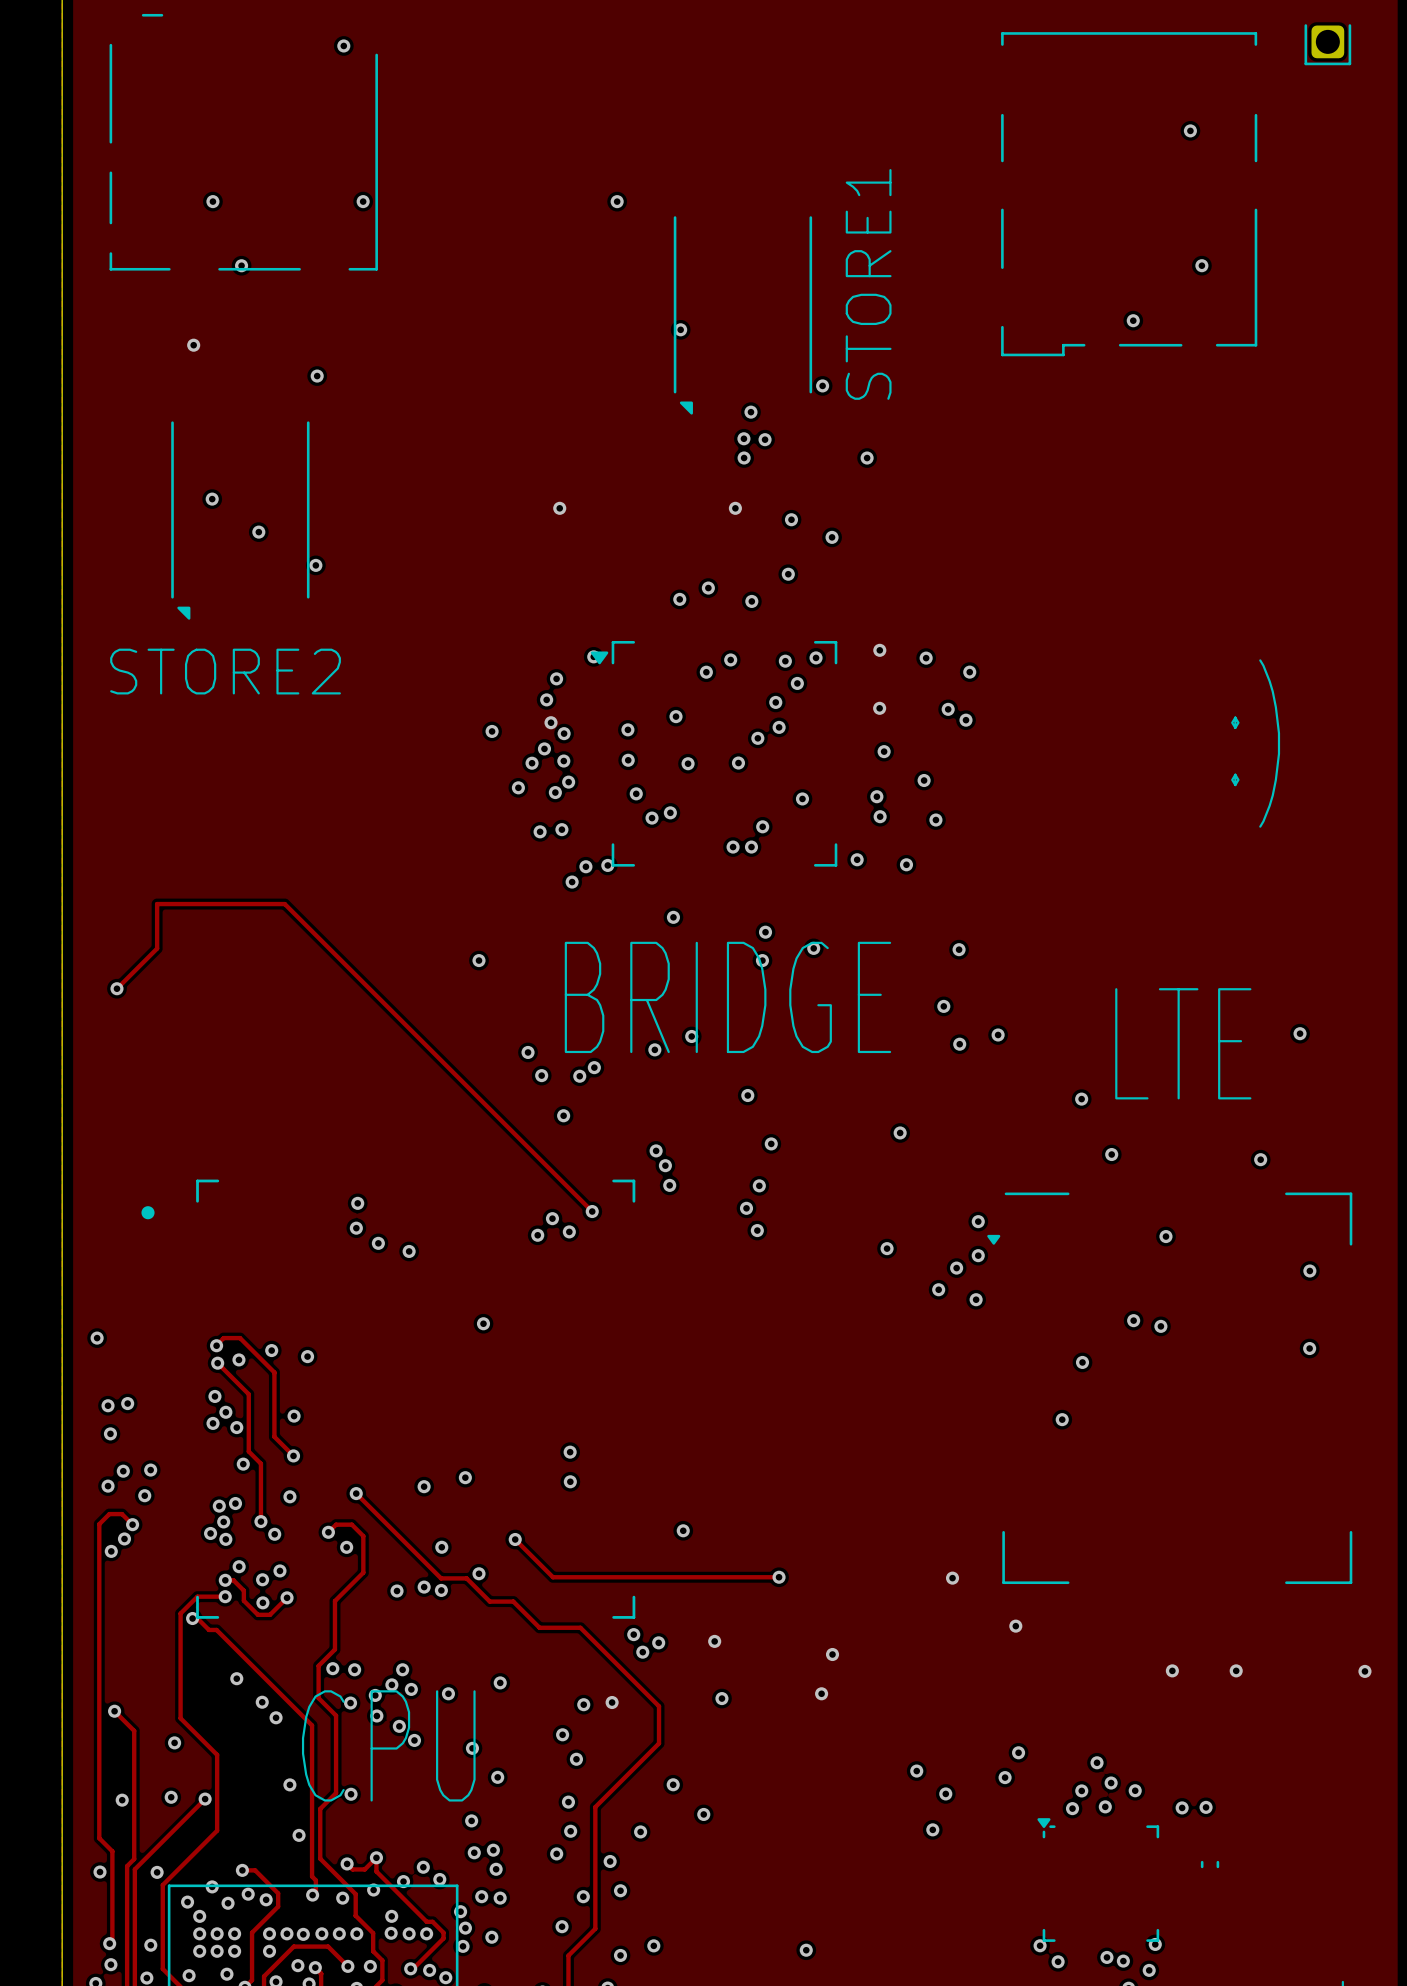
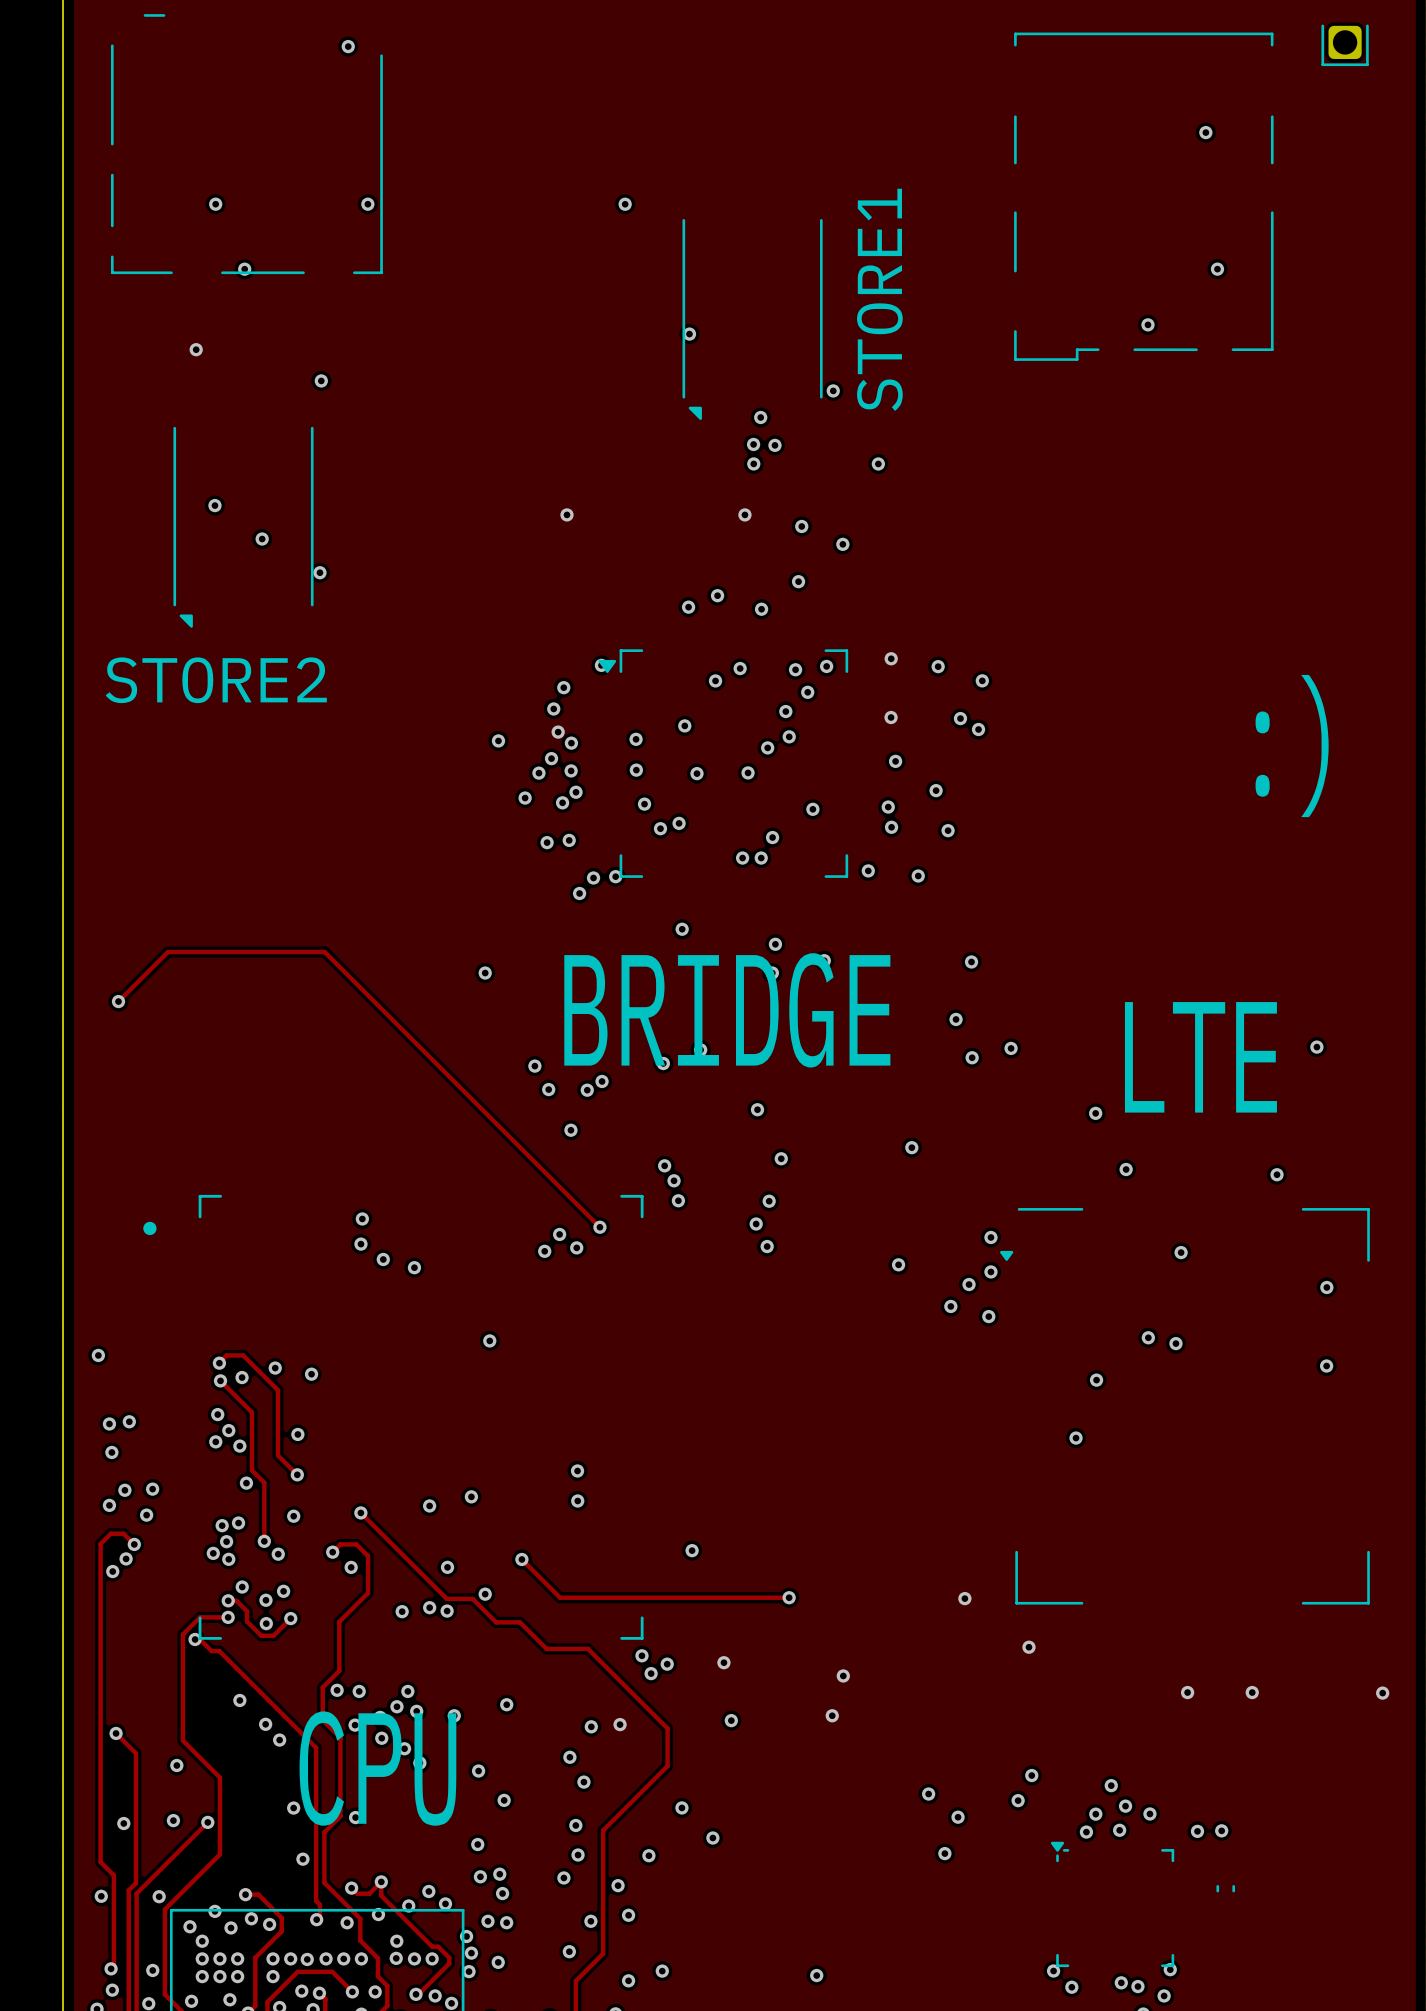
track: (320, 939) (284, 904) (157, 904) (157, 948) -> (324, 952) (168, 952) (159, 960)

